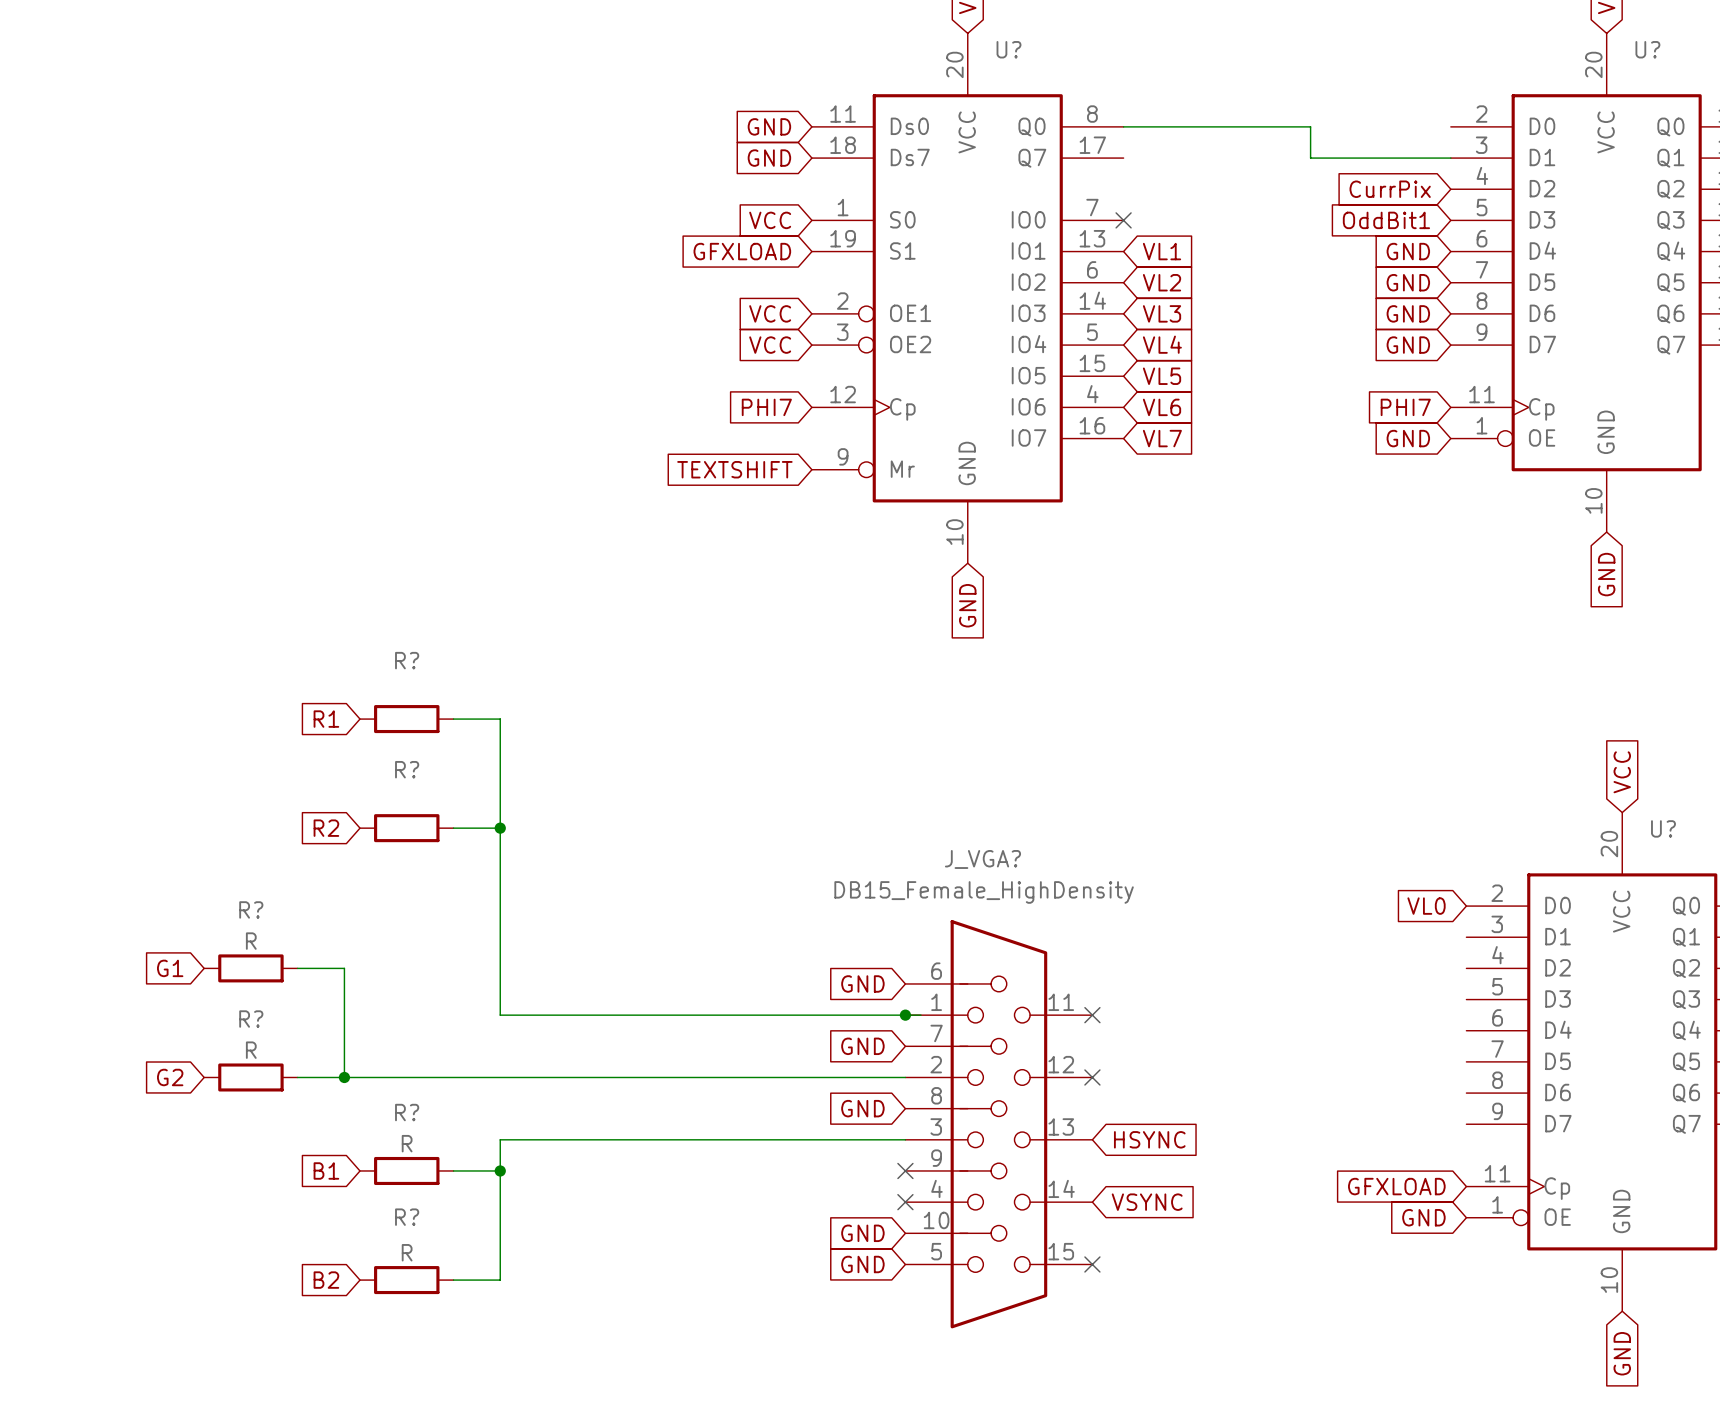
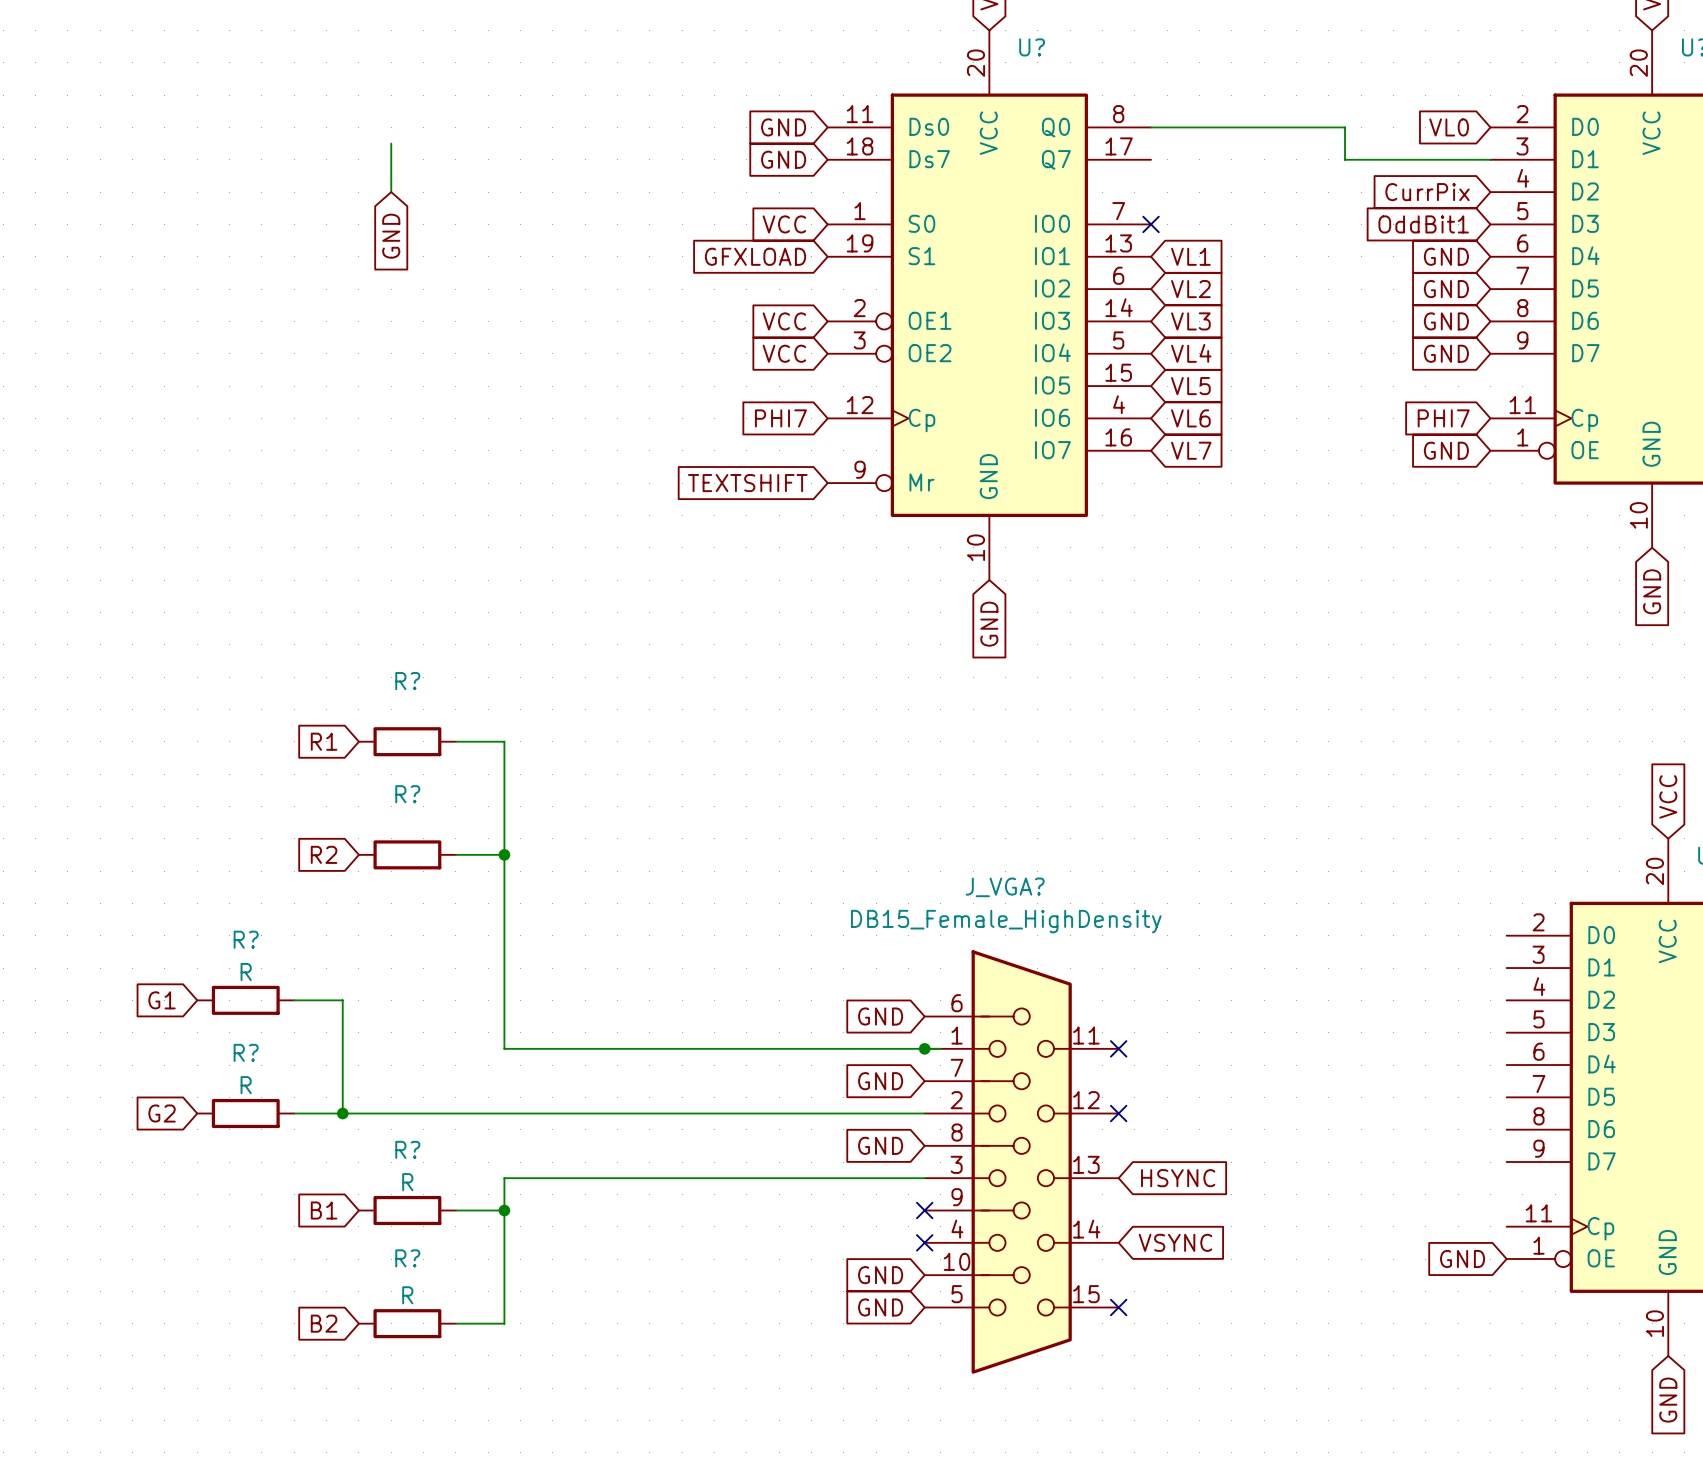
global label: none -> VL0 (1449, 127)
wire: none -> (391, 143) (391, 192)
global label: none -> GND (391, 236)
global label: VL0 (1426, 906) -> none
global label: GFXLOAD (1396, 1186) -> none

